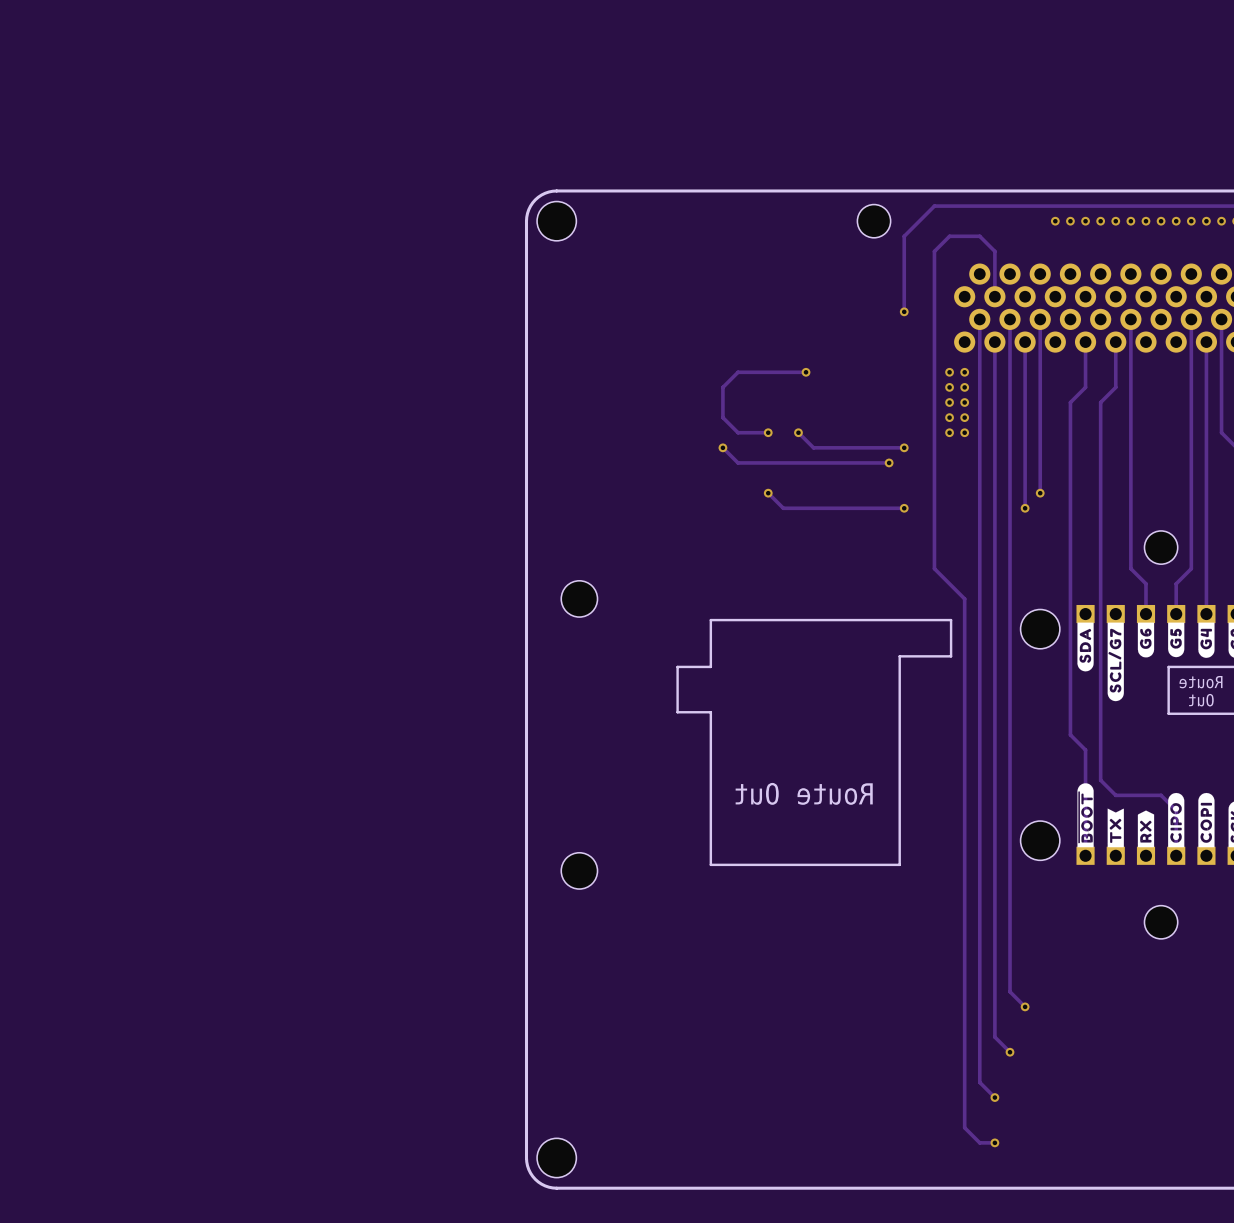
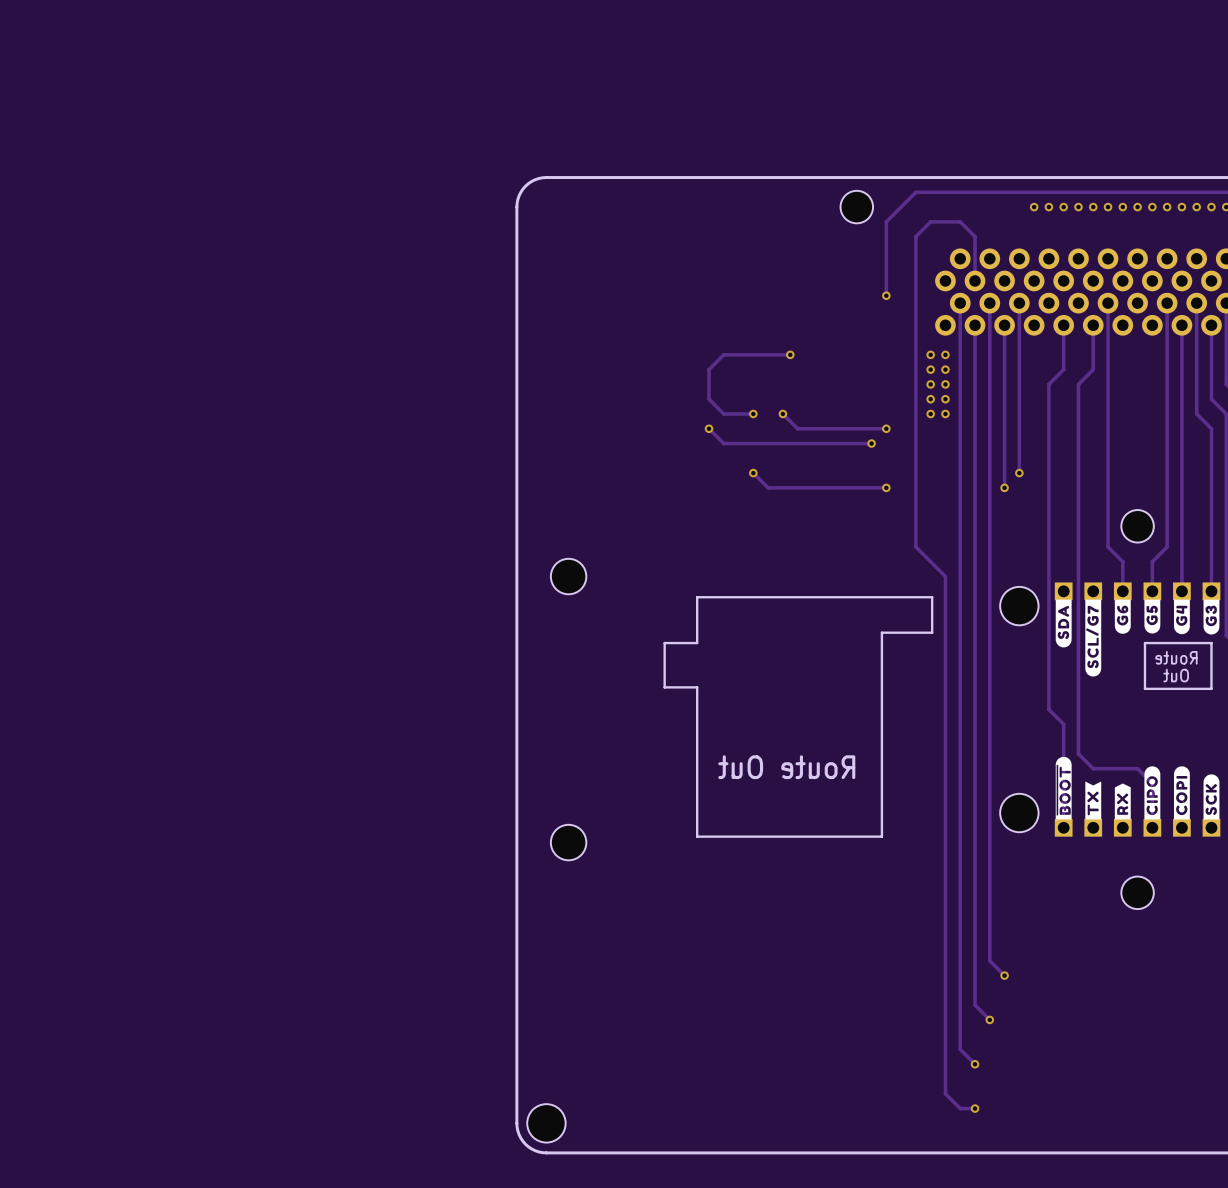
part: (556, 221) -> none

